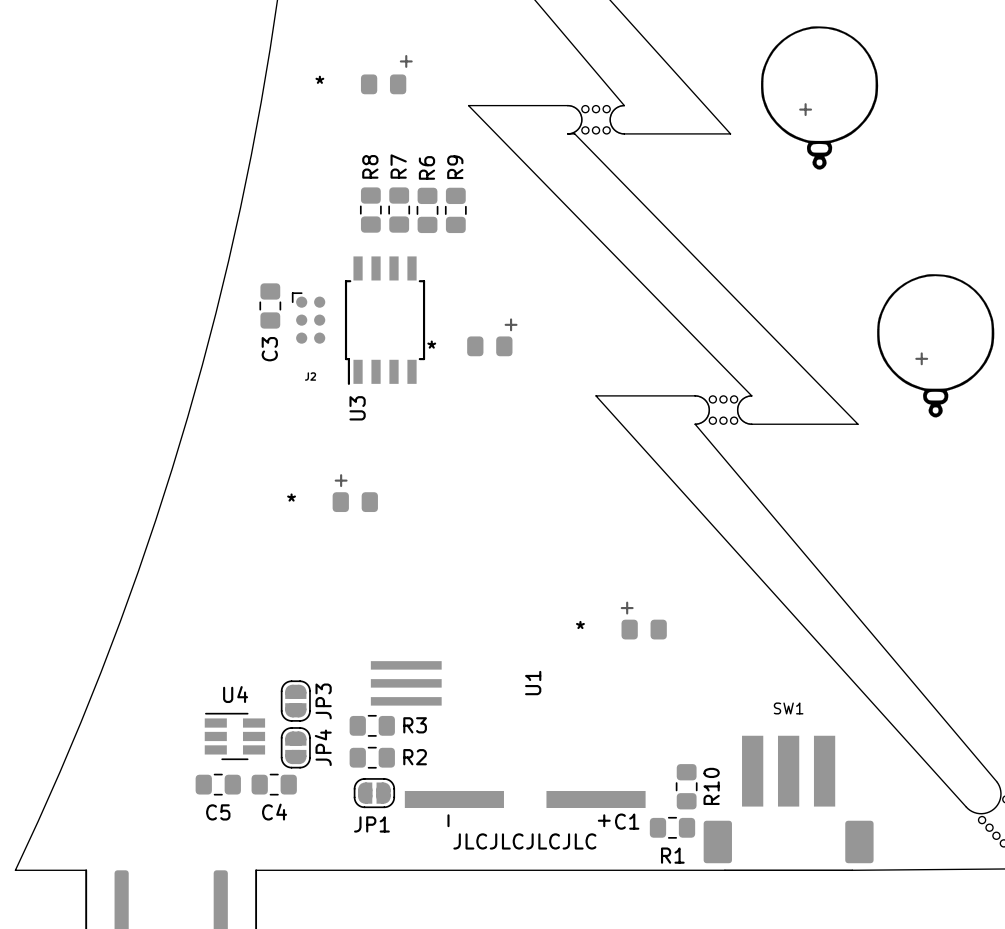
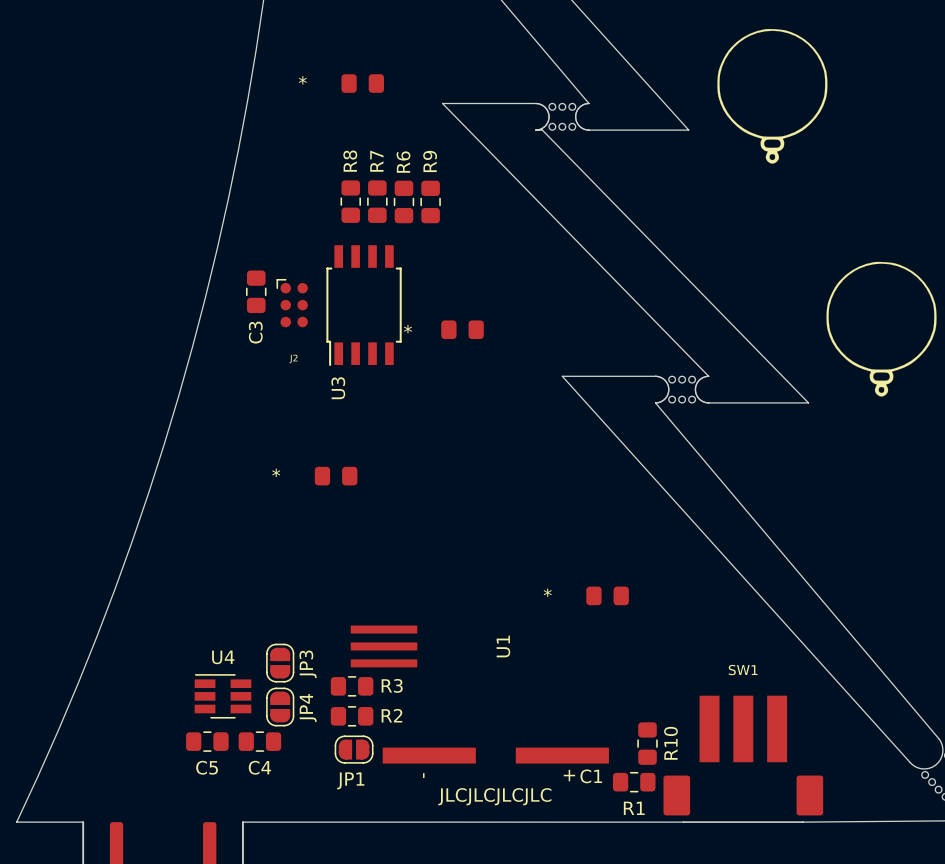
text: + (406, 61) -> none
text: + (805, 109) -> none
text: + (511, 324) -> none
text: + (921, 358) -> none
text: + (341, 480) -> none
text: + (627, 608) -> none

